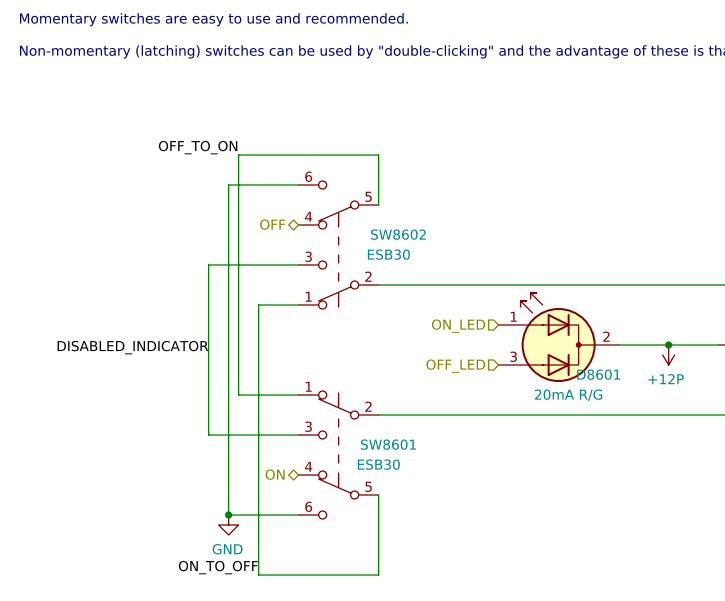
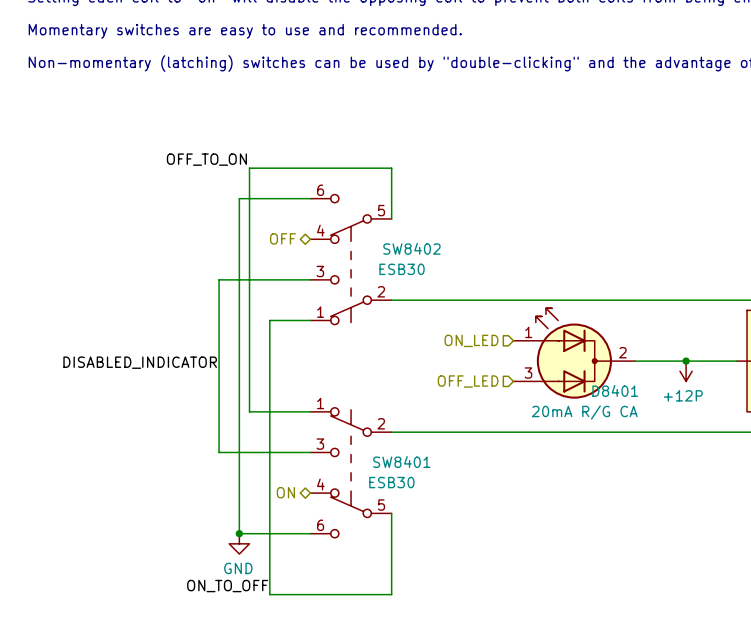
SW8602 name: SW8602 (398, 234) -> SW8402 (411, 248)
D8601 name: D8601 (598, 374) -> D8401 (615, 390)
D8601 value: 20mA R/G (568, 395) -> 20mA R/G CA (584, 412)
SW8601 name: SW8601 (388, 444) -> SW8401 (401, 462)

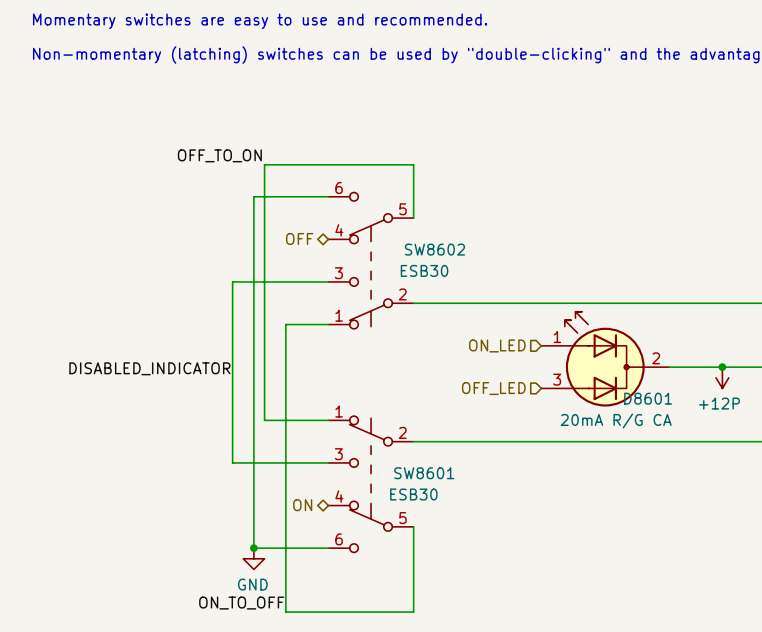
SW8402 name: SW8402 (411, 248) -> SW8602 (434, 249)
D8401 name: D8401 (615, 390) -> D8601 (648, 398)
SW8401 name: SW8401 (401, 462) -> SW8601 (424, 473)

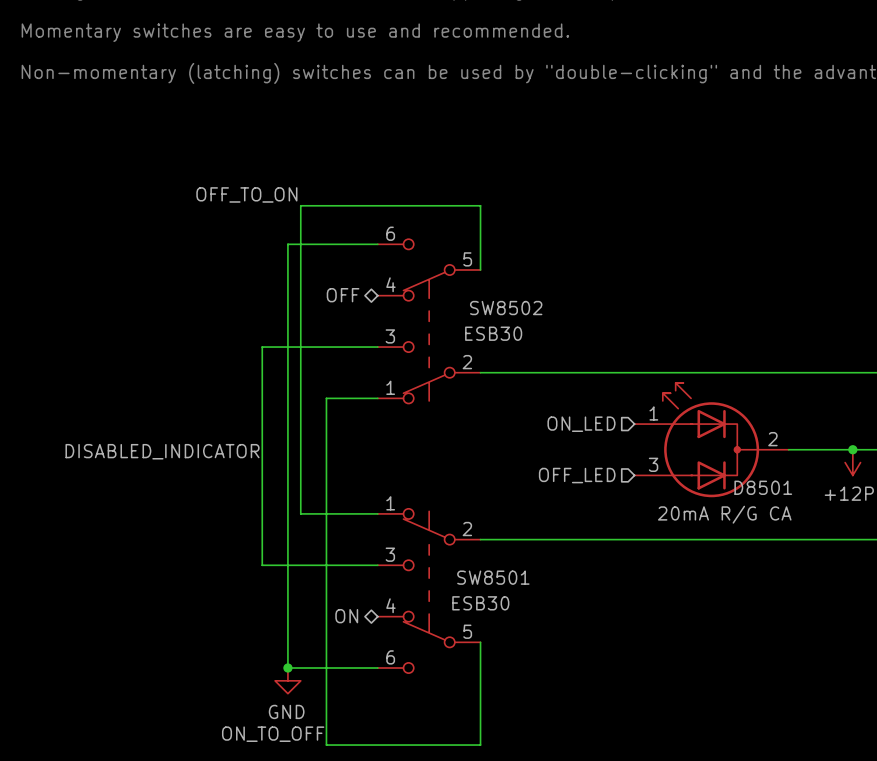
SW8602 name: SW8602 (434, 249) -> SW8502 (506, 308)
D8601 name: D8601 (648, 398) -> D8501 (763, 487)
SW8601 name: SW8601 (424, 473) -> SW8501 (493, 577)

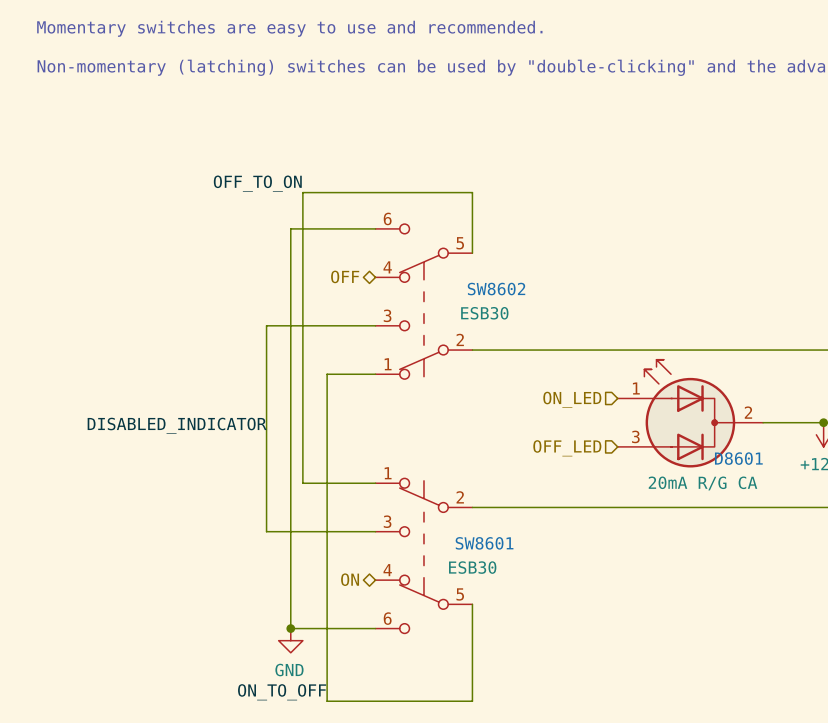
SW8502 name: SW8502 (506, 308) -> SW8602 (496, 289)
D8501 name: D8501 (763, 487) -> D8601 (738, 458)
SW8501 name: SW8501 (493, 577) -> SW8601 (484, 543)

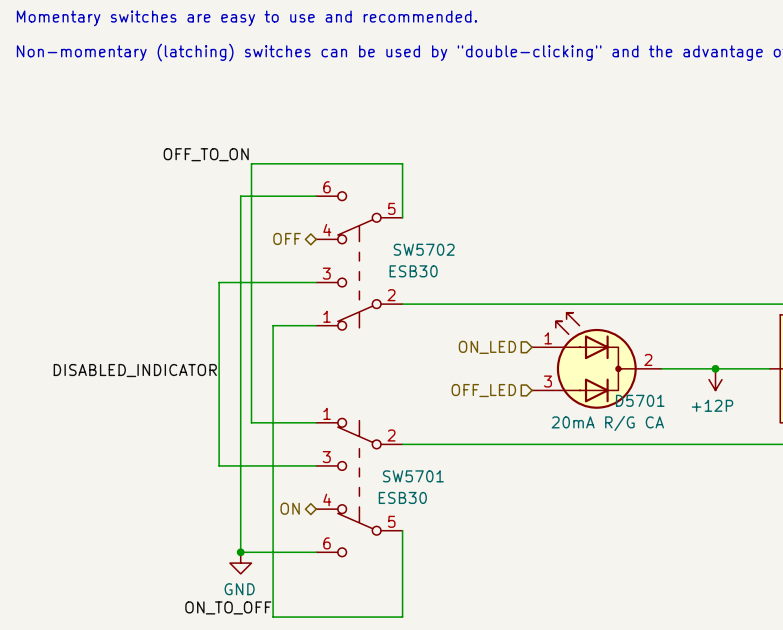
SW8602 name: SW8602 (496, 289) -> SW5702 (424, 249)
D8601 name: D8601 (738, 458) -> D5701 (640, 400)
SW8601 name: SW8601 (484, 543) -> SW5701 (413, 476)

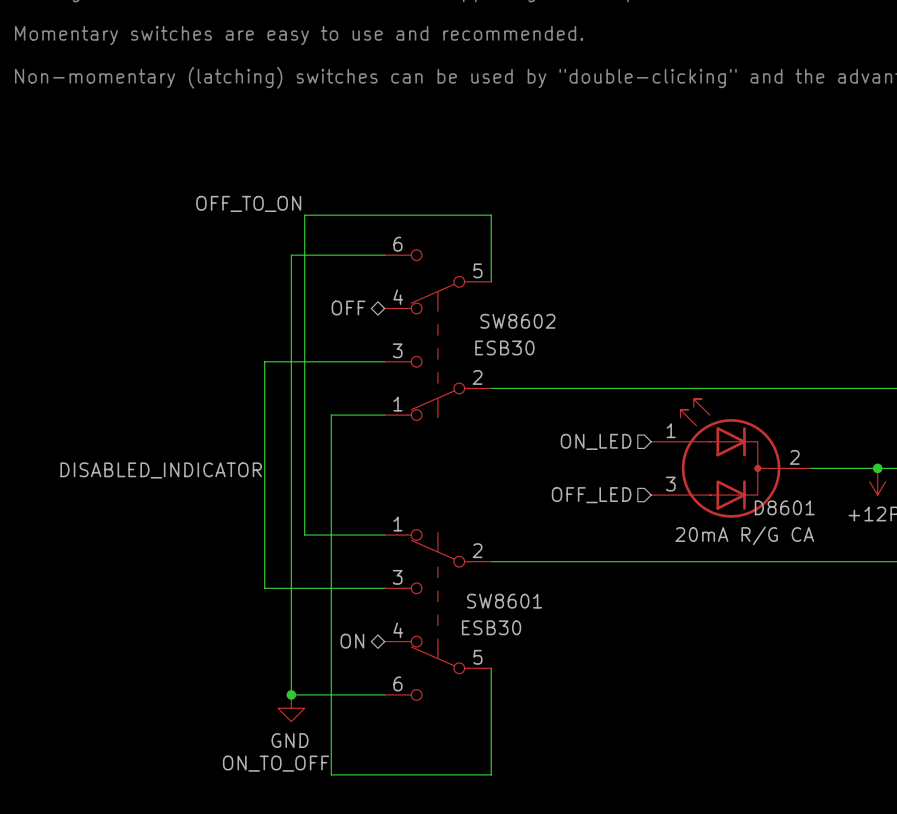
SW5702 name: SW5702 (424, 249) -> SW8602 (517, 321)
D5701 name: D5701 (640, 400) -> D8601 (784, 507)
SW5701 name: SW5701 (413, 476) -> SW8601 (504, 601)

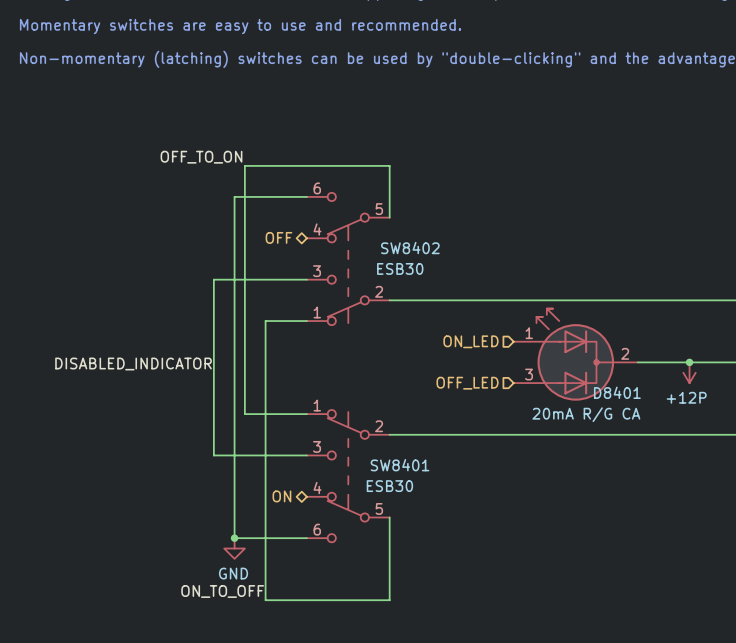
SW8602 name: SW8602 (517, 321) -> SW8402 (410, 248)
D8601 name: D8601 (784, 507) -> D8401 (617, 392)
SW8601 name: SW8601 (504, 601) -> SW8401 (400, 465)

